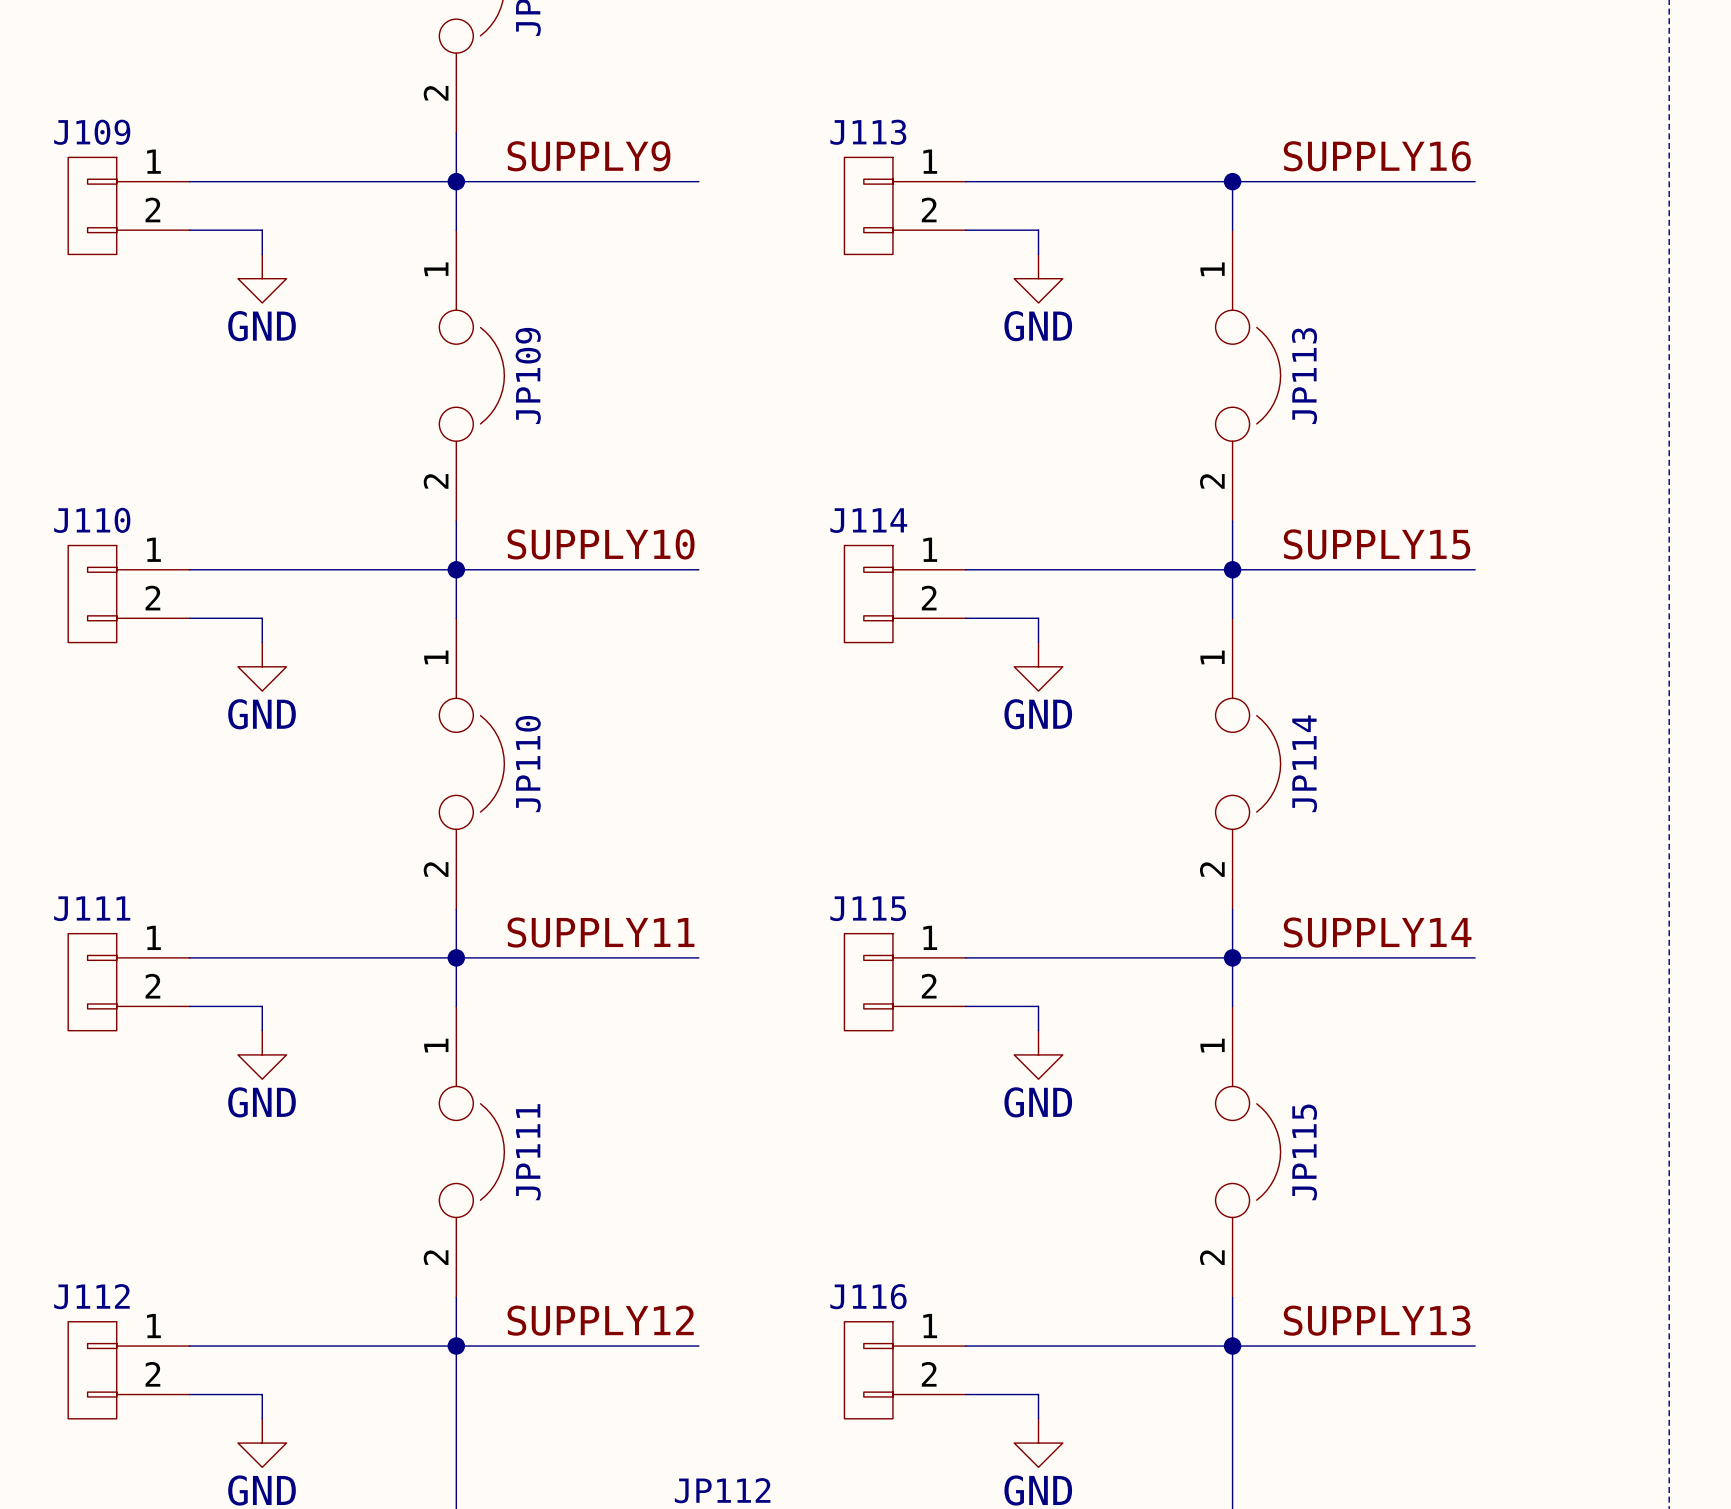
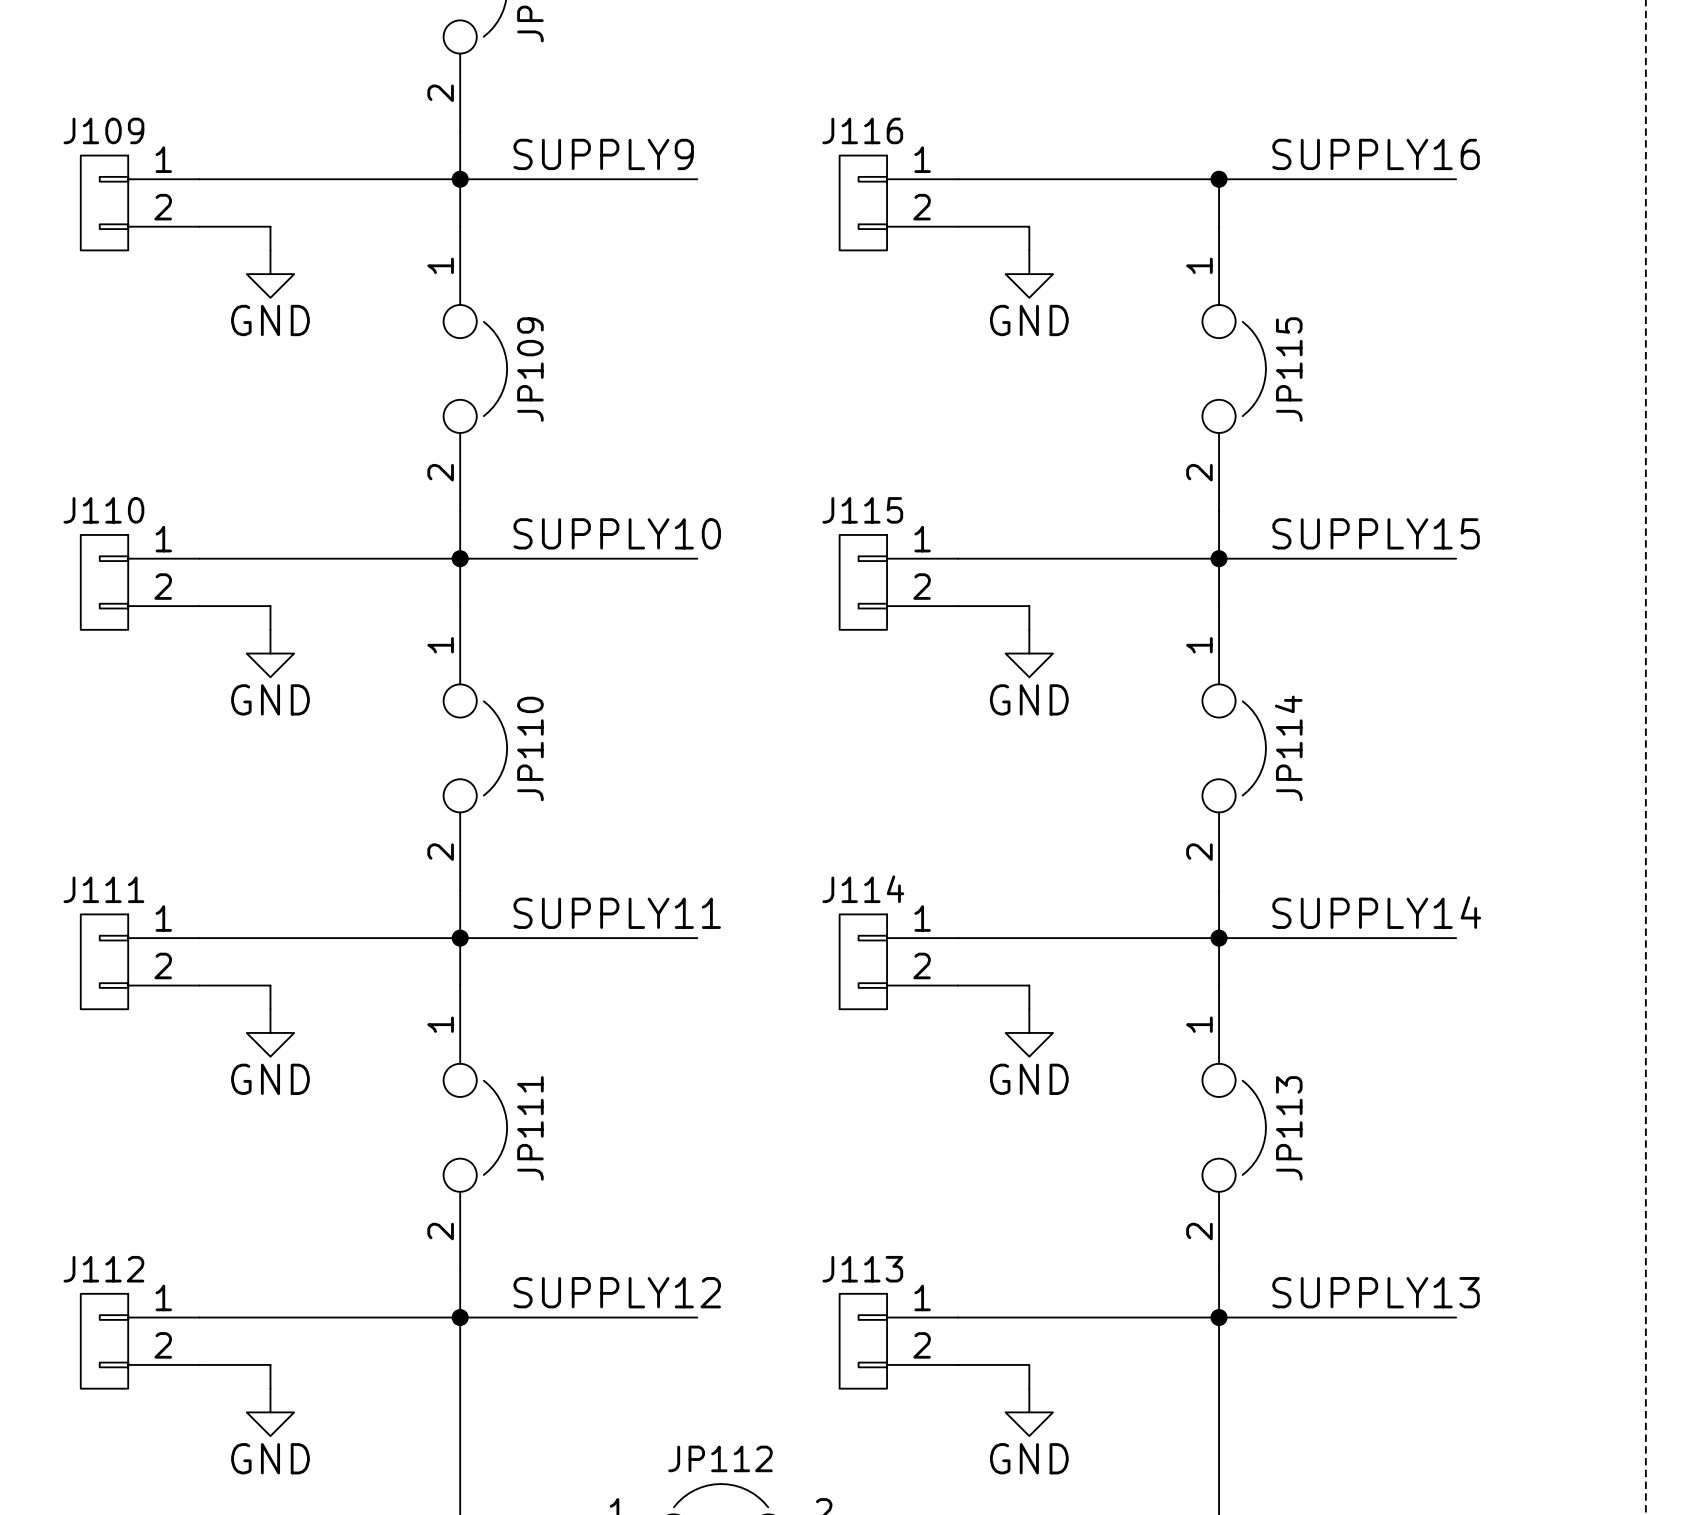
J113 name: J113 (868, 132) -> J116 (862, 130)
JP113 name: JP113 (1304, 376) -> JP115 (1289, 369)
J114 name: J114 (868, 520) -> J115 (862, 510)
J115 name: J115 (868, 908) -> J114 (863, 889)
JP115 name: JP115 (1304, 1152) -> JP113 (1289, 1128)
J116 name: J116 (868, 1296) -> J113 (862, 1269)

